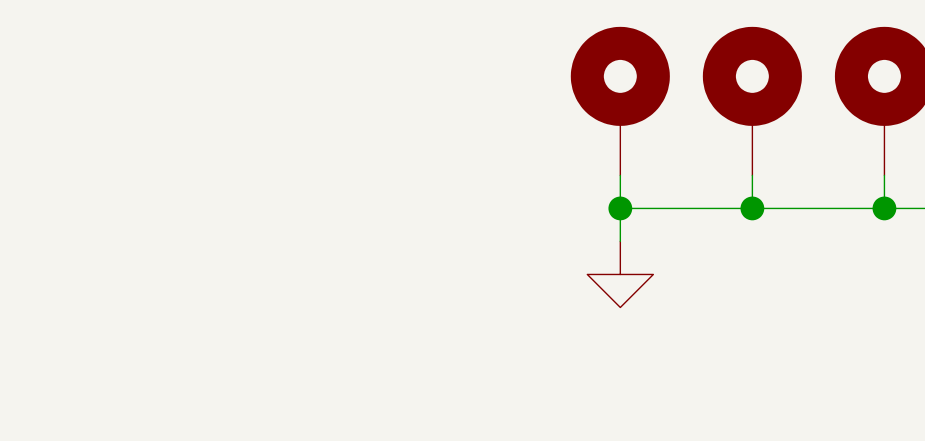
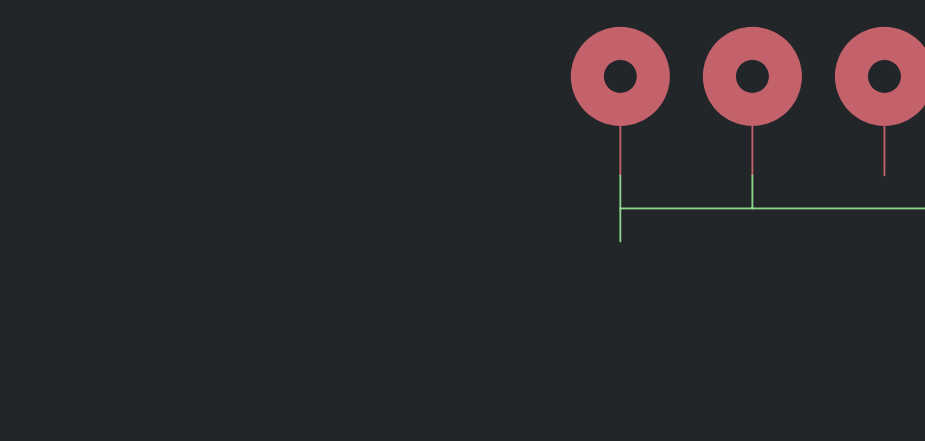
wire: (884, 175) (884, 208) -> none
junction: (620, 208) -> none
junction: (752, 208) -> none
junction: (884, 208) -> none
power symbol: (620, 274) -> none

